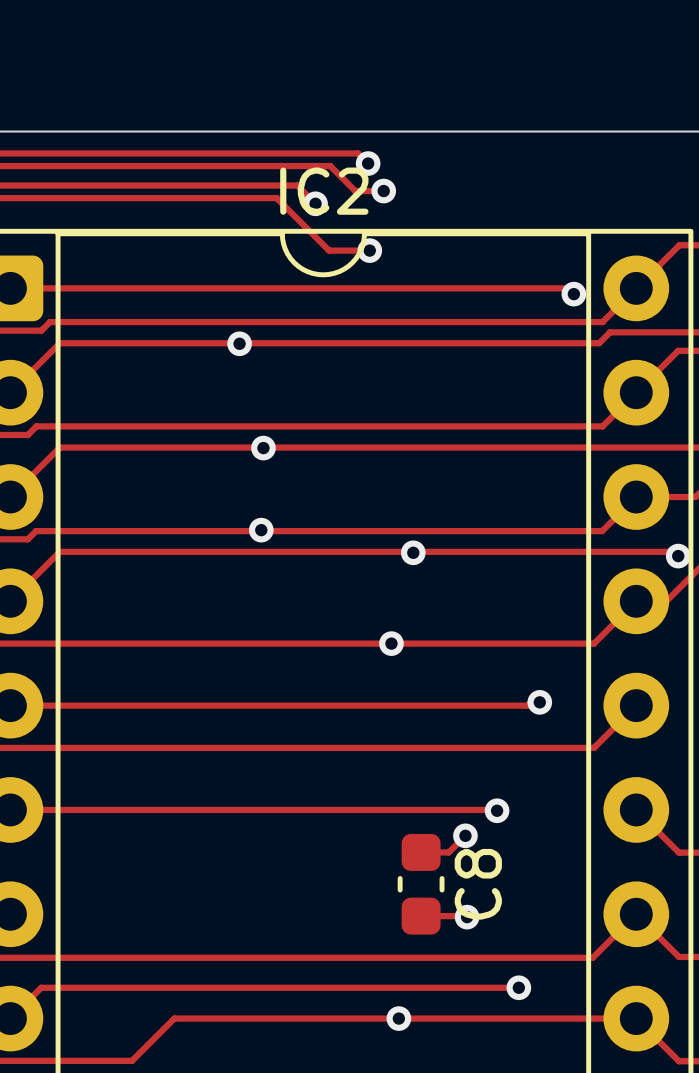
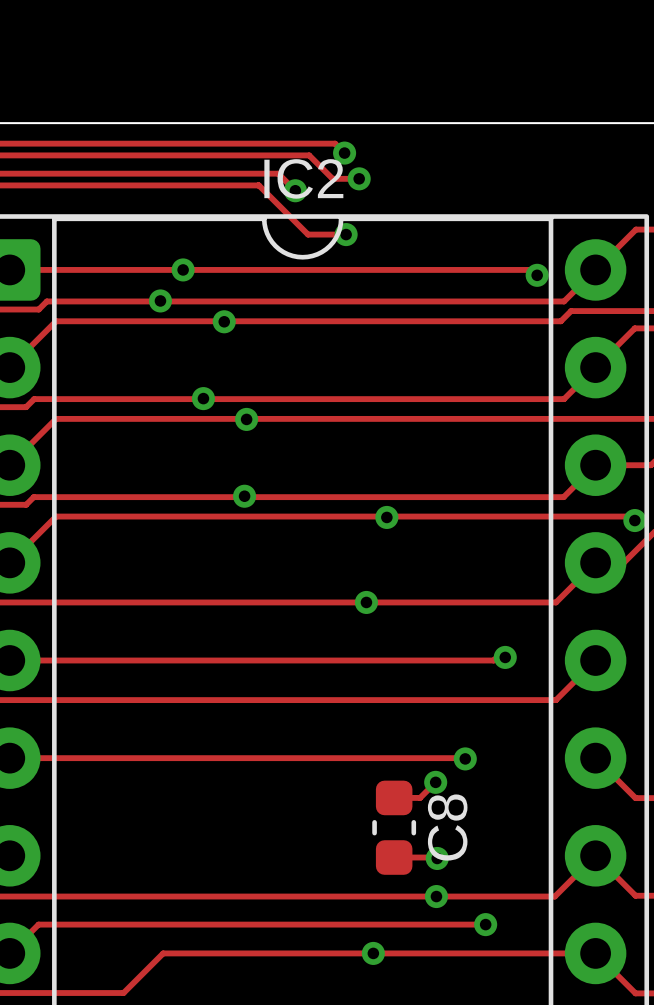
via: none -> (183, 269)
via: none -> (160, 300)
via: none -> (203, 398)
via: none -> (436, 896)

